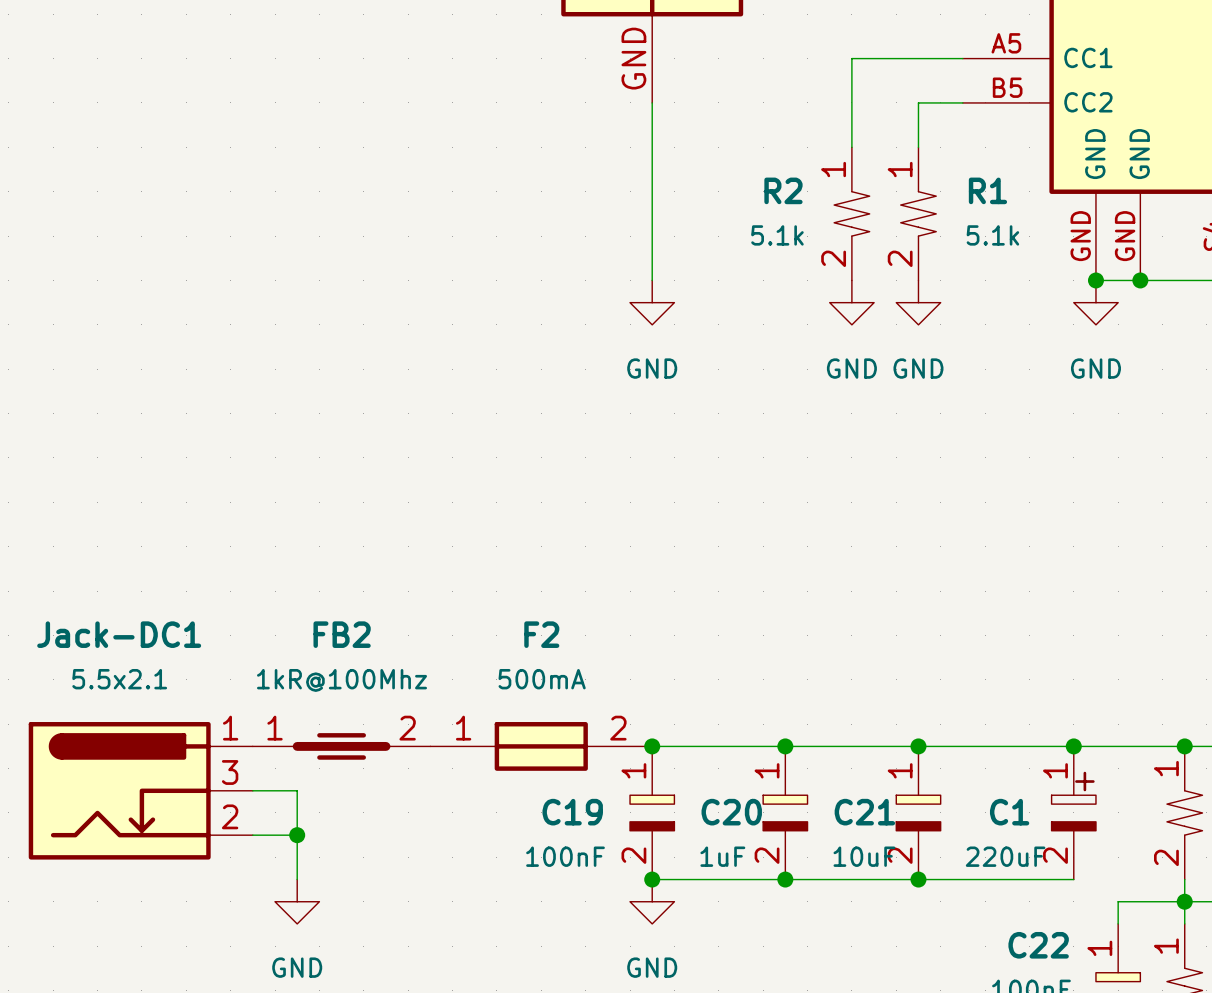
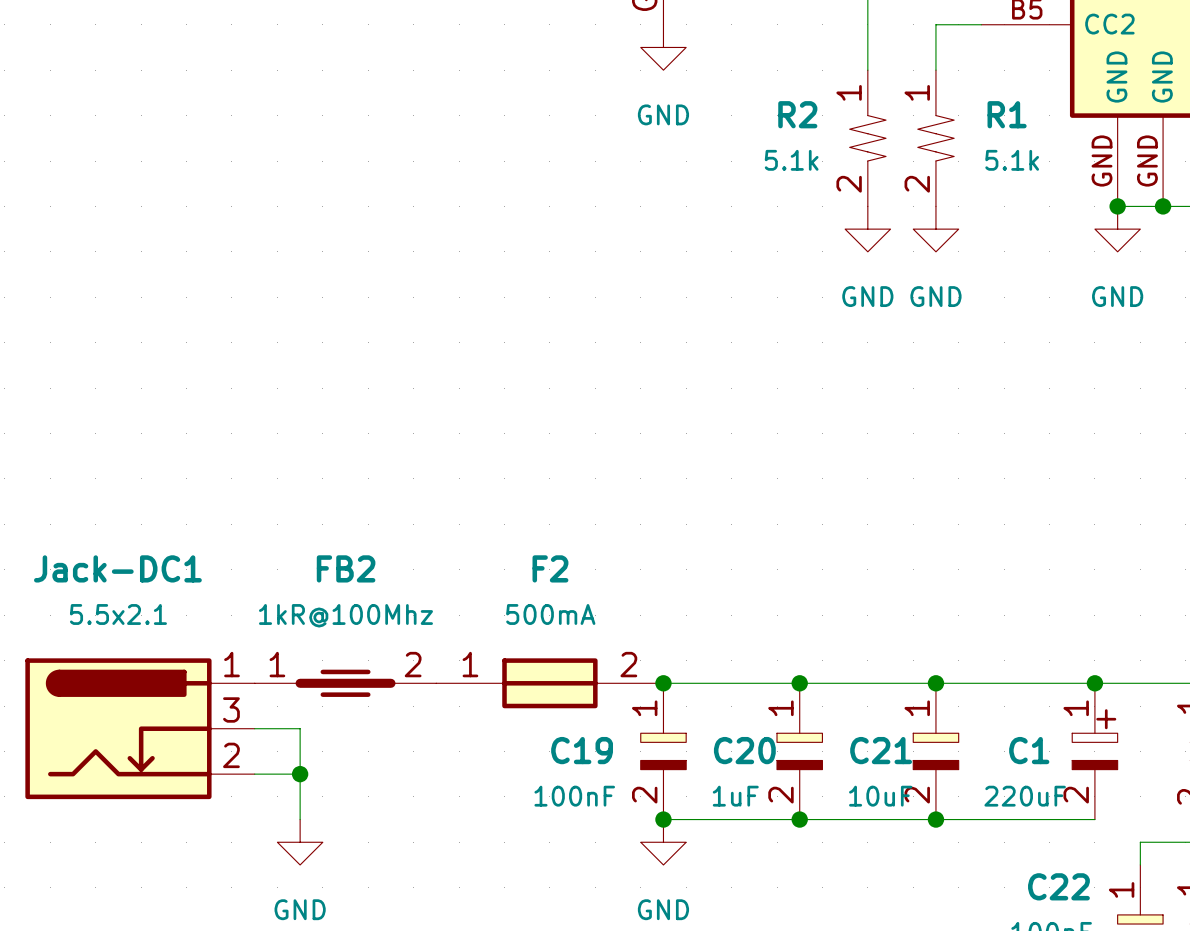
wire: (652, 102) (652, 280) -> none
power symbol position: GND (652, 302) -> GND (663, 47)

